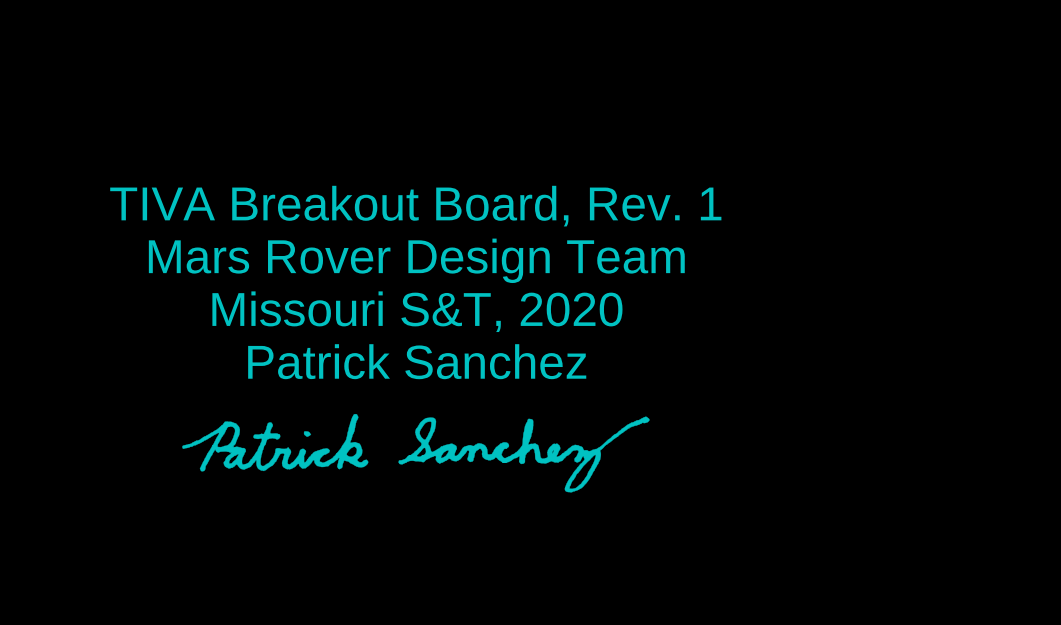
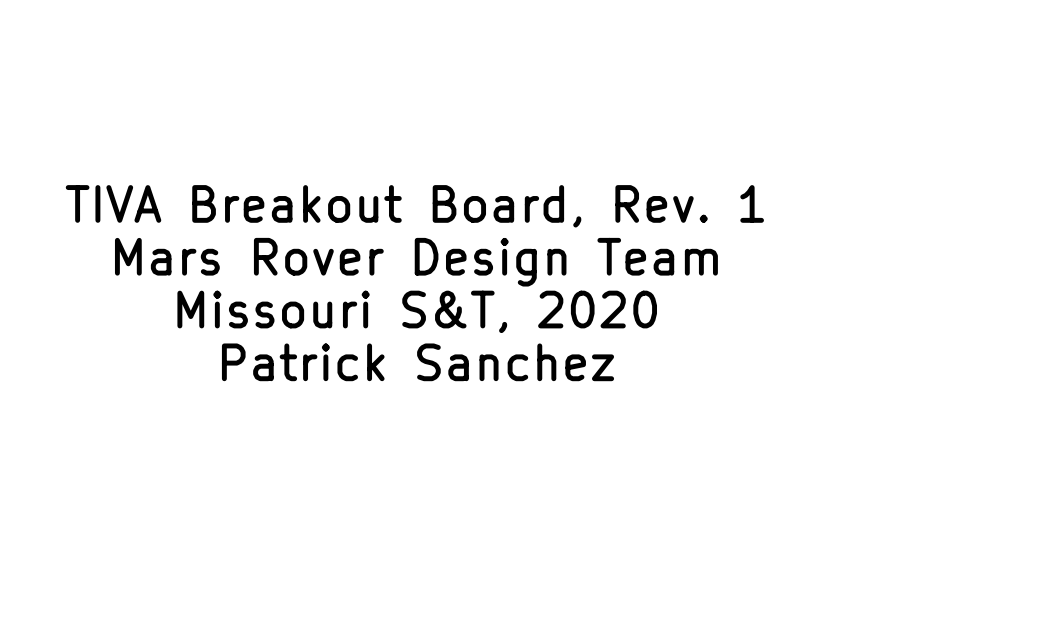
drawing: [182, 413, 650, 493] -> none

